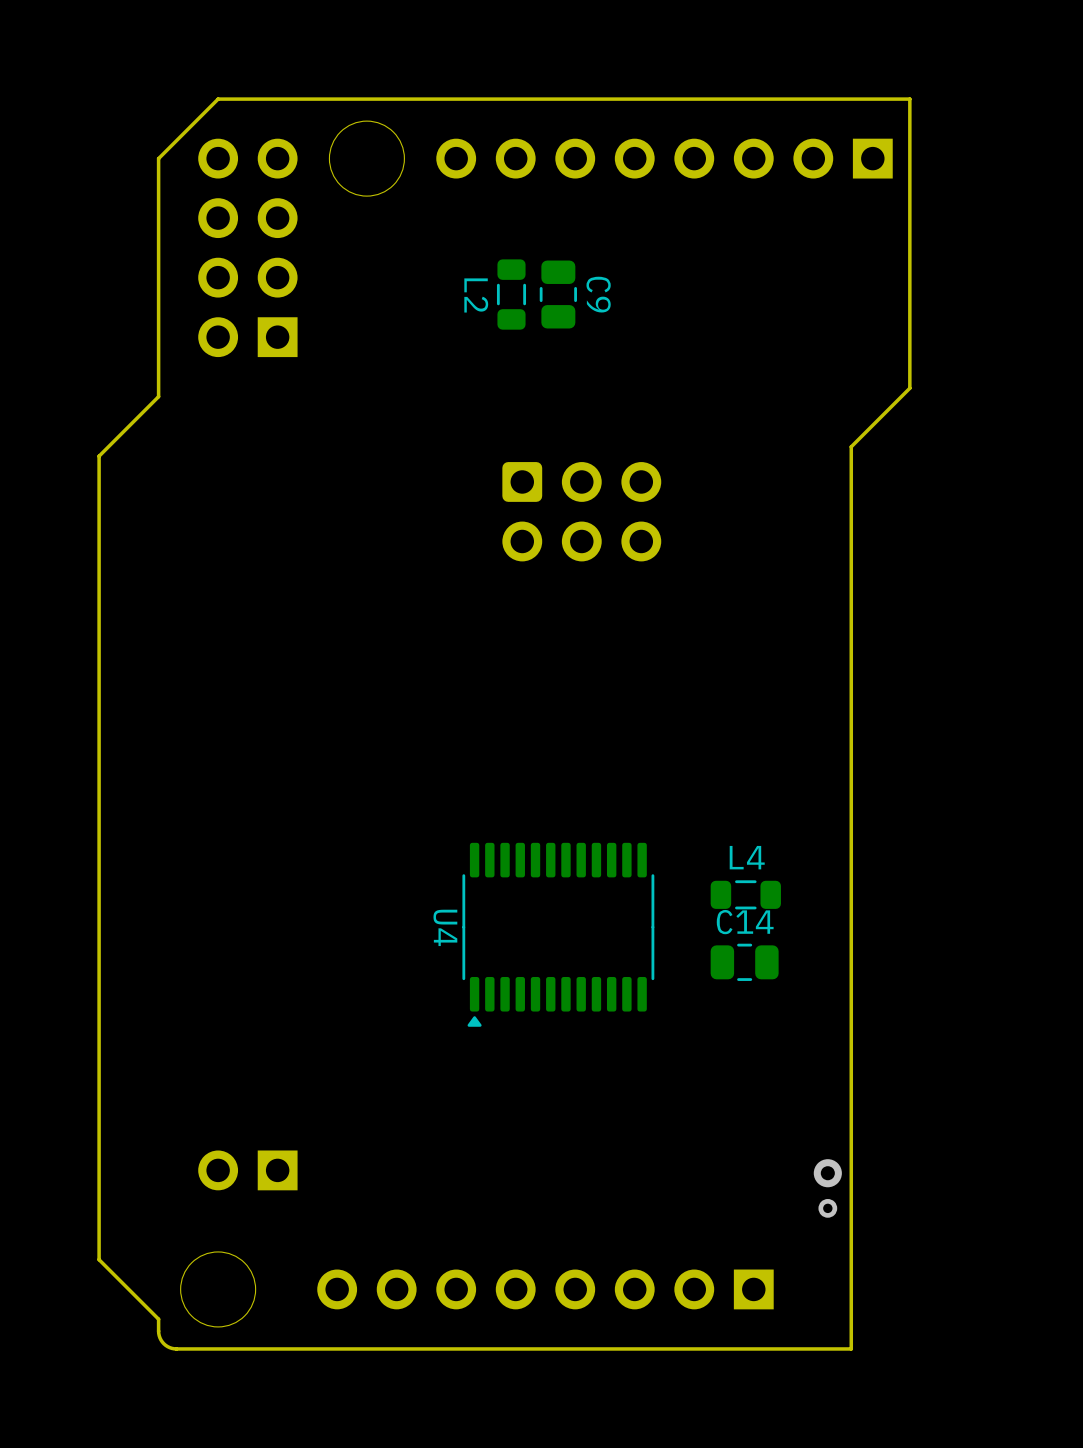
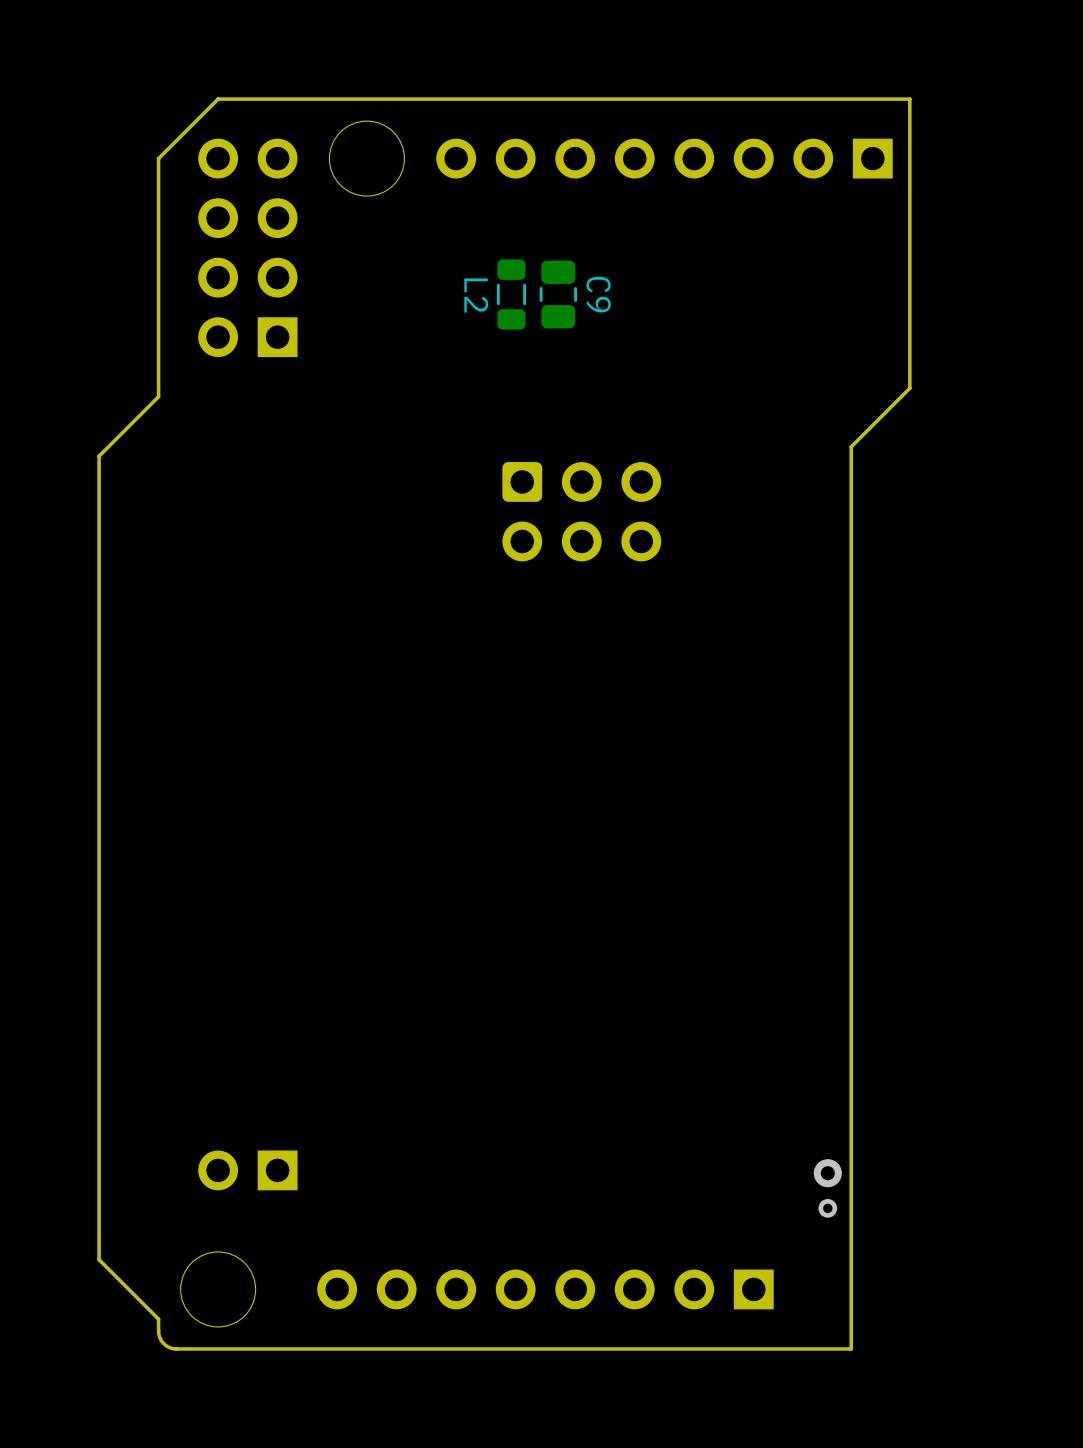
L4: (745, 894) -> none
U4: (558, 934) -> none
C14: (744, 962) -> none

